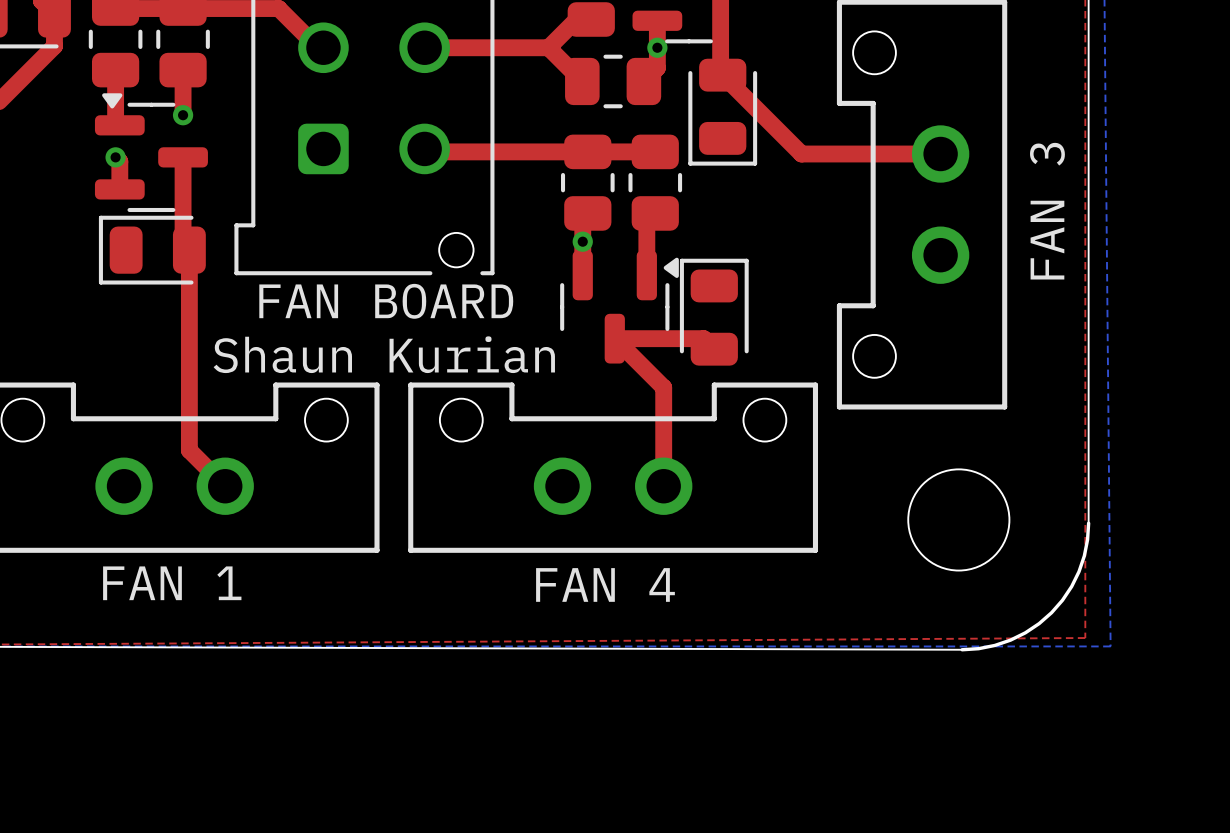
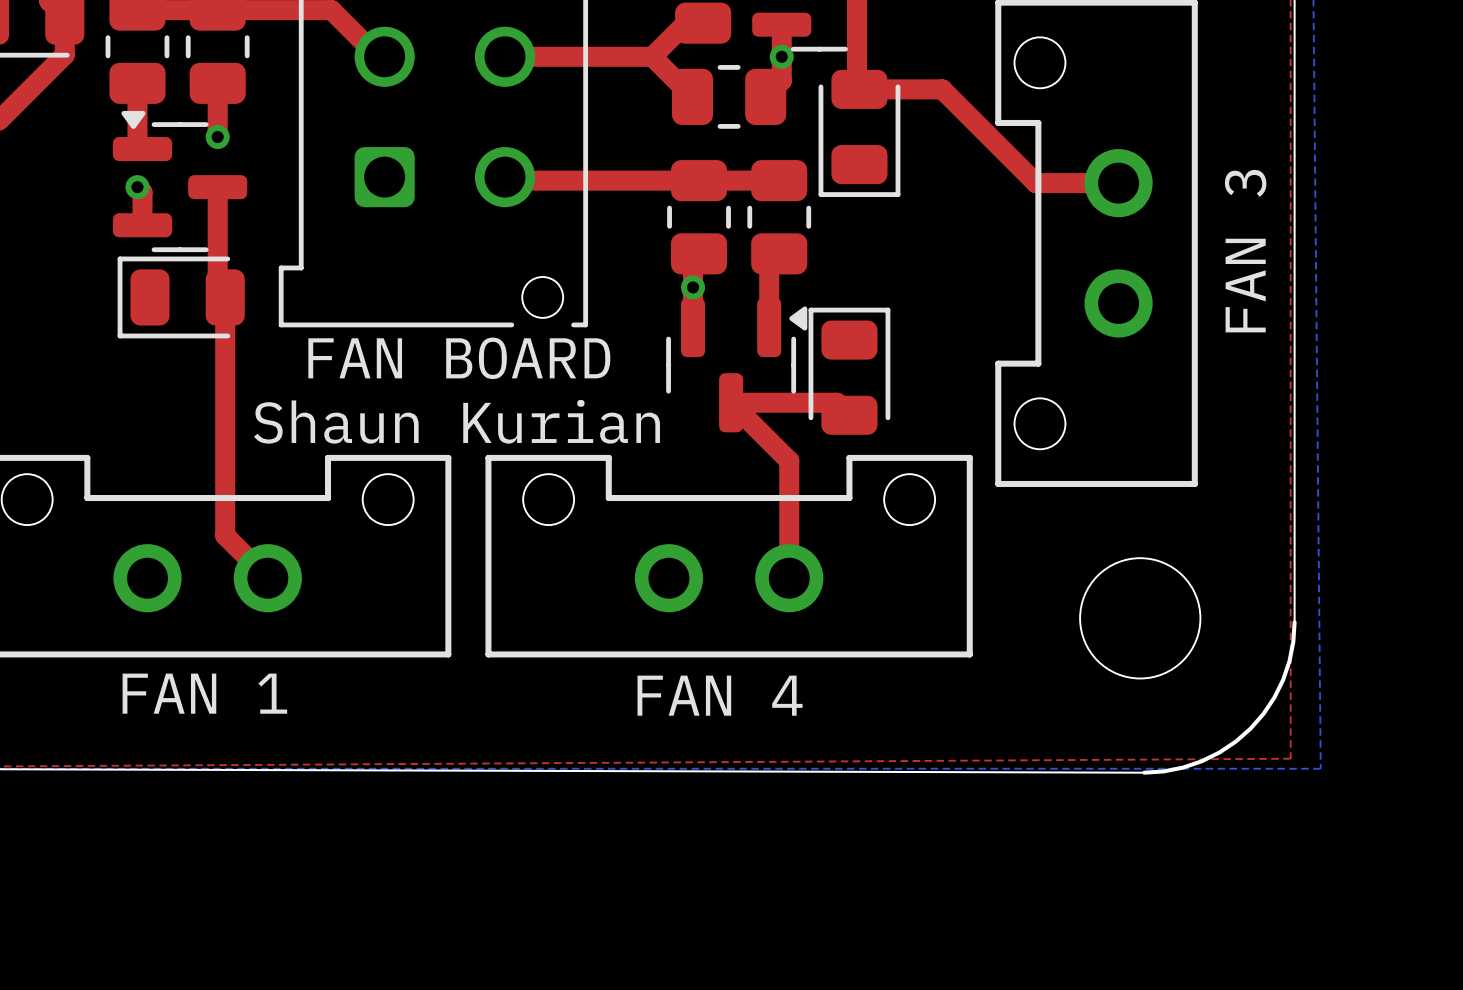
top track: (722, 75) (801, 154) (871, 154) -> (859, 89) (942, 89) (1035, 183)

